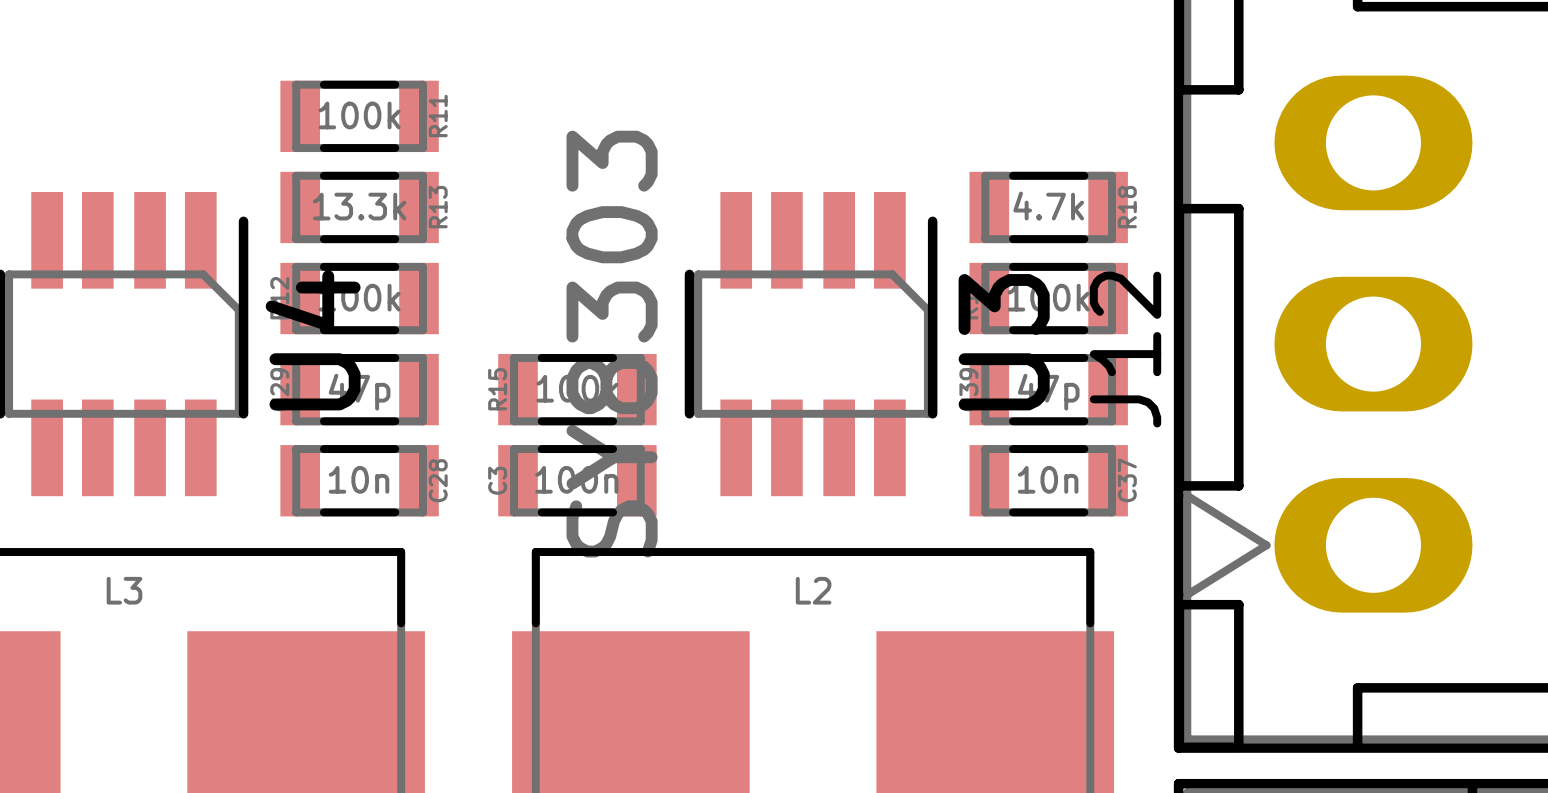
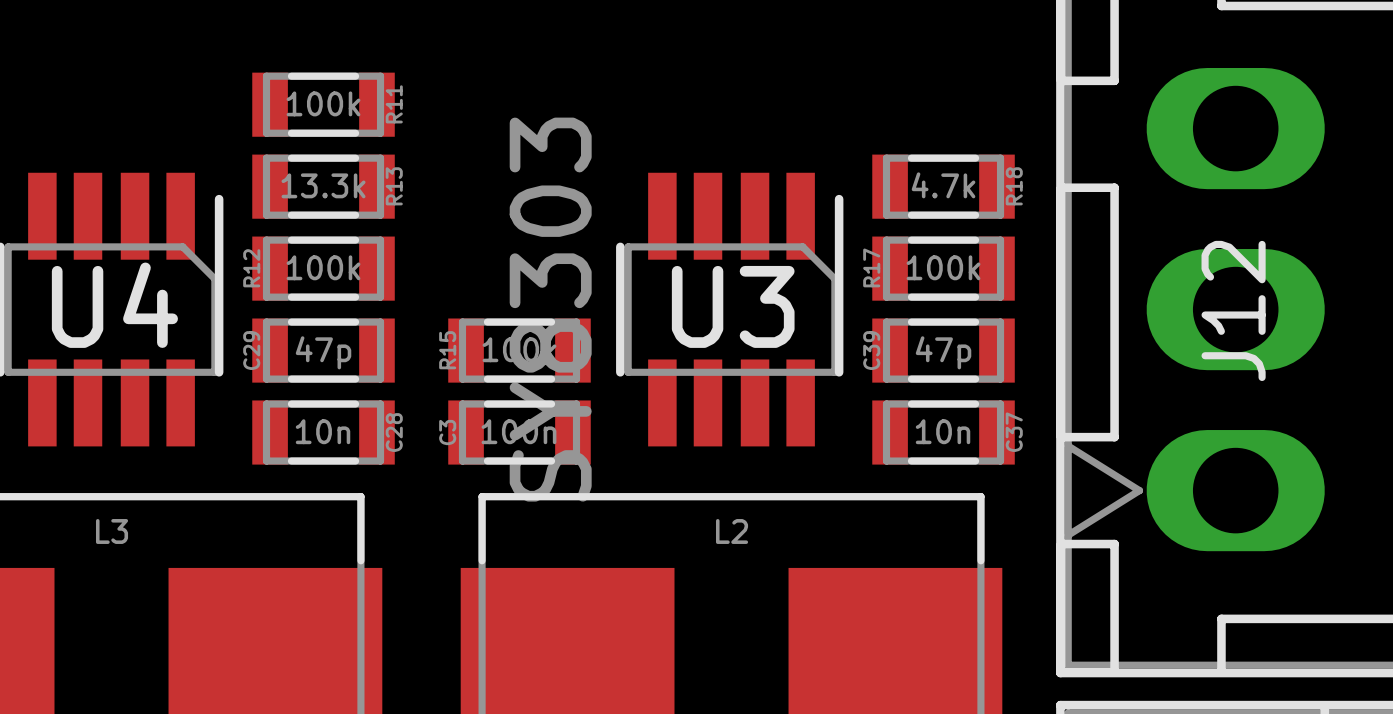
U4 name rotation: 0° (313, 340) -> 90° clockwise (114, 305)
U3 name rotation: 0° (1004, 342) -> 90° clockwise (733, 306)
J12 name position: J12 (1125, 349) -> J12 (1233, 310)

